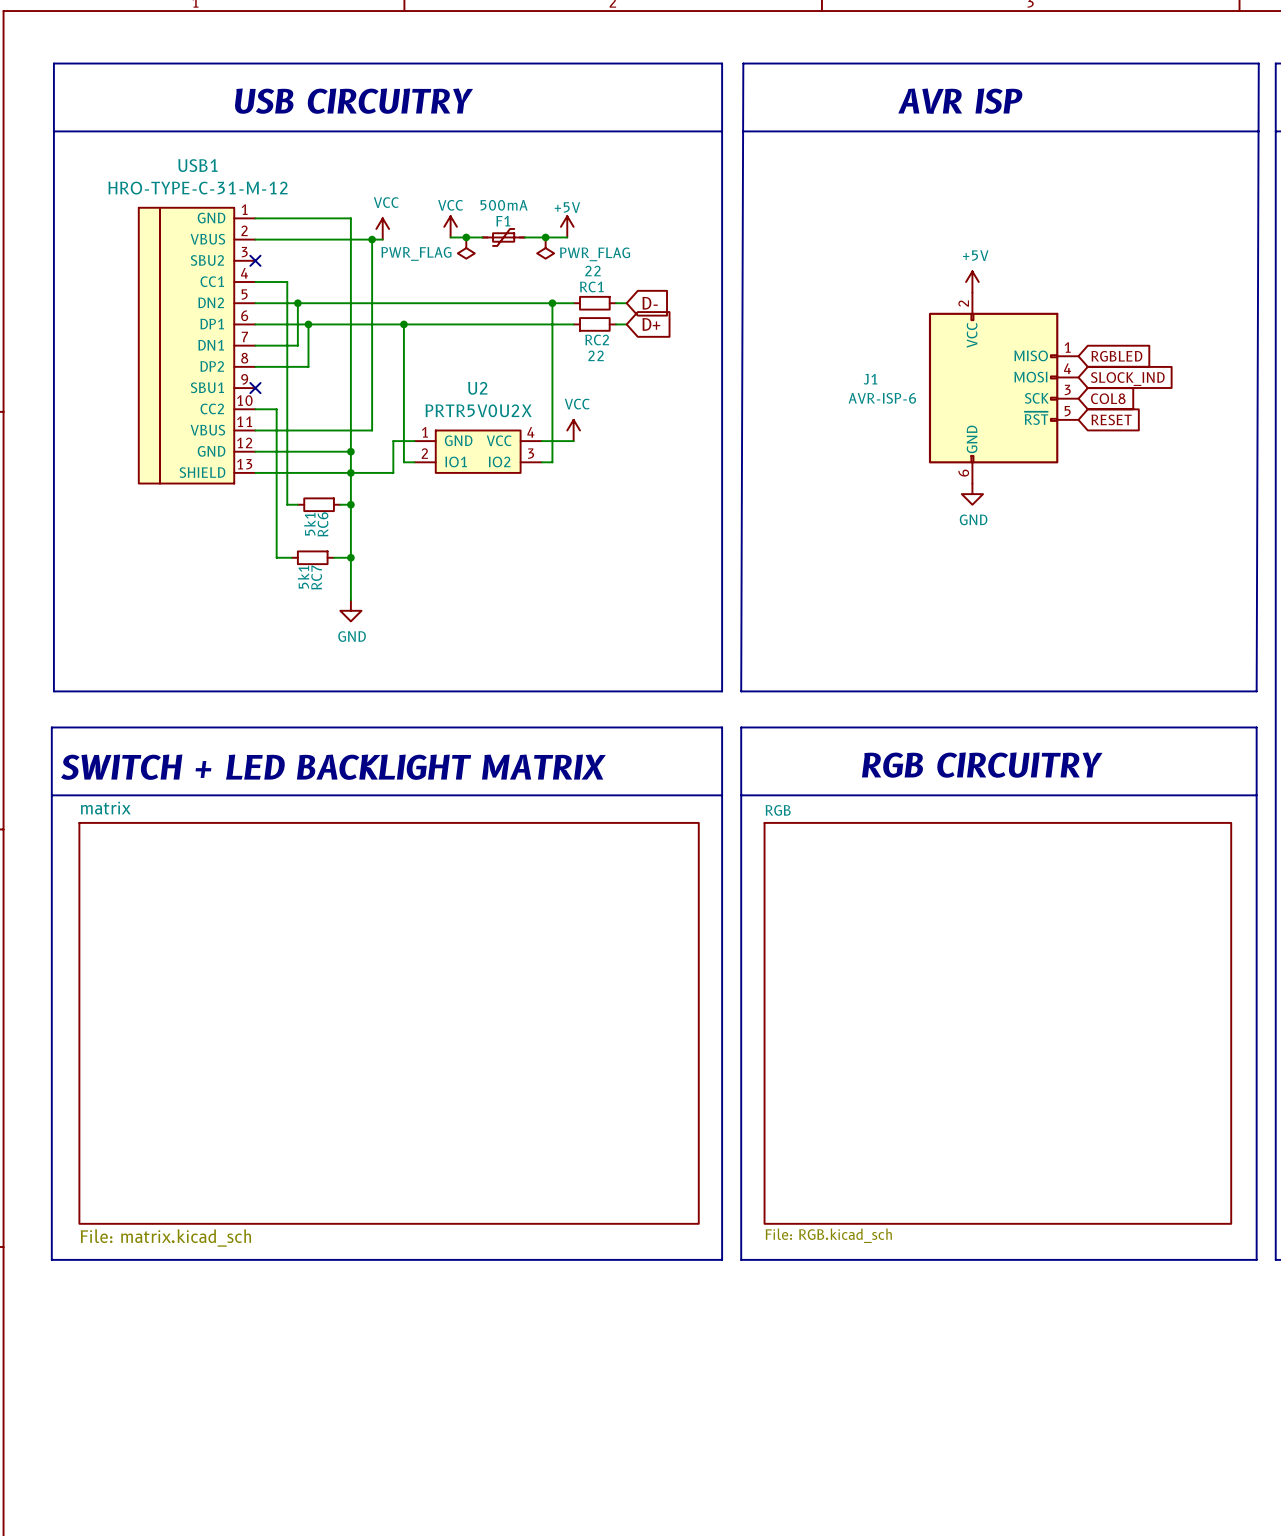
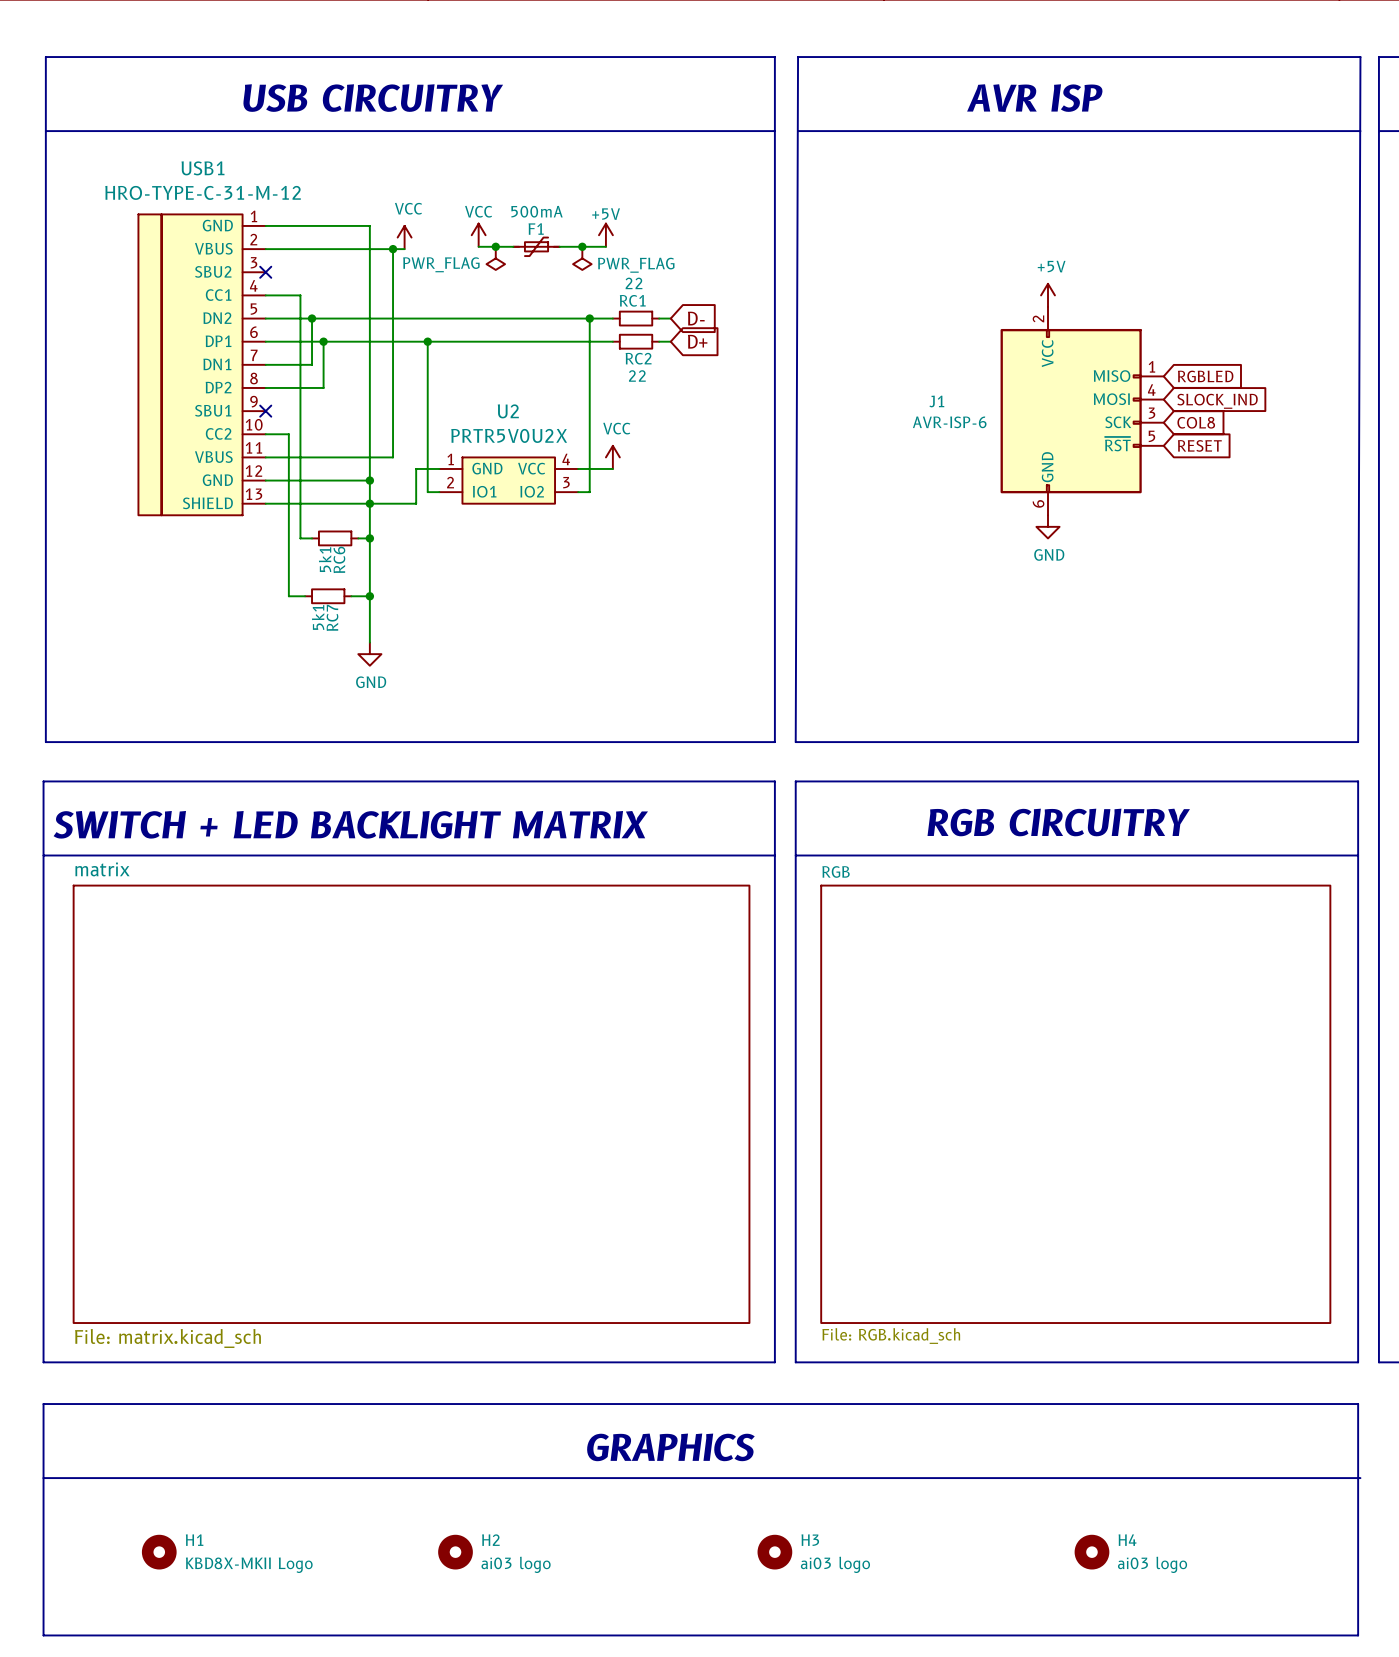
line: none -> (43, 1404) (1358, 1404) (1358, 1635) (43, 1635) (43, 1404)
text: none -> GRAPHICS (670, 1447)
line: none -> (43, 1478) (1360, 1478)
H1: none -> KBD8X-MKII Logo (159, 1552)
H2: none -> ai03 logo (455, 1552)
H3: none -> ai03 logo (774, 1552)
H4: none -> ai03 logo (1091, 1552)

